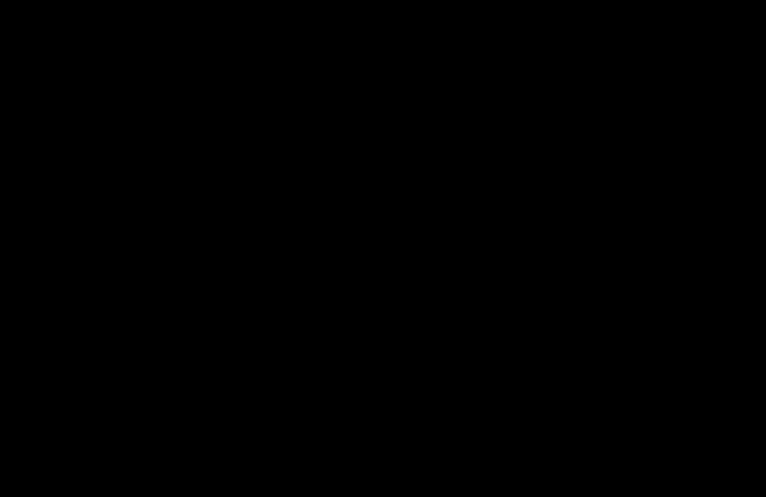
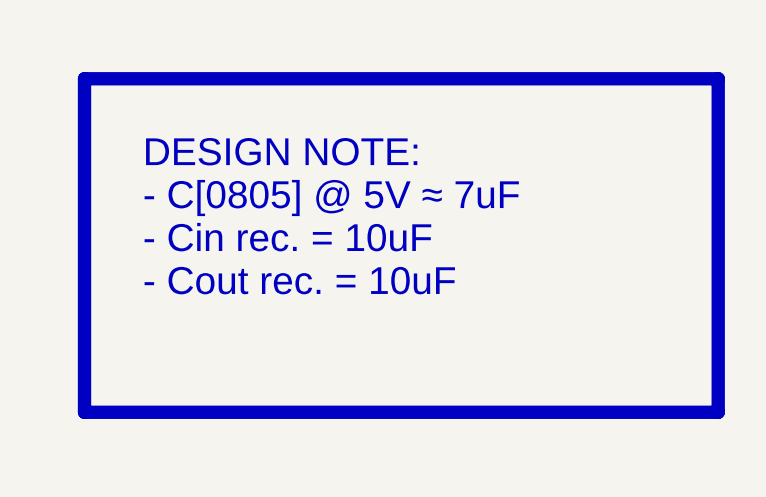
line: none -> (84, 78) (718, 78) (718, 412) (84, 412) (84, 78)
text: none -> DESIGN NOTE: (281, 151)
text: none -> - C[0805] @ 5V ≈ 7uF (331, 198)
text: none -> - Cin rec. = 10uF (287, 237)
text: none -> - Cout rec. = 10uF (299, 280)

